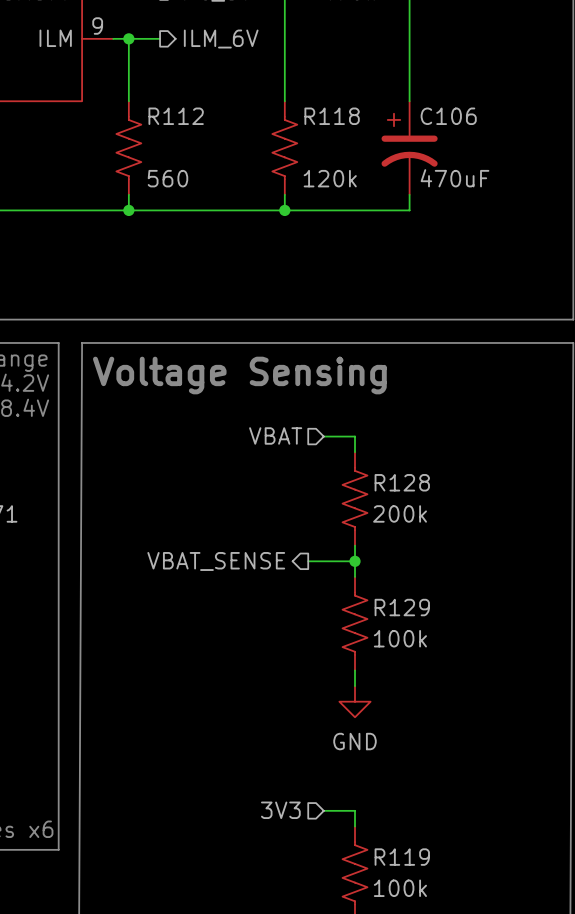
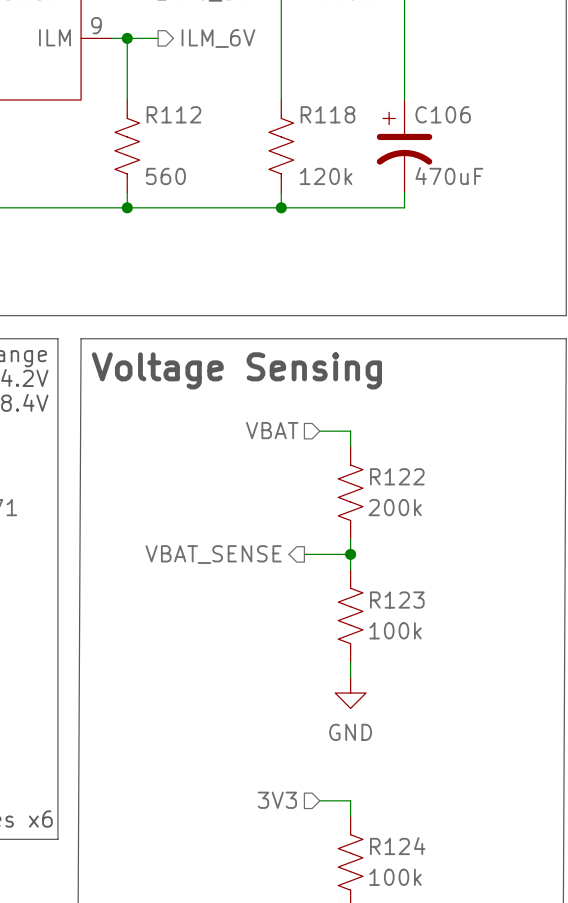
R128 name: R128 (402, 482) -> R122 (397, 476)
R129 name: R129 (402, 607) -> R123 (397, 600)
R119 name: R119 (402, 857) -> R124 (397, 846)

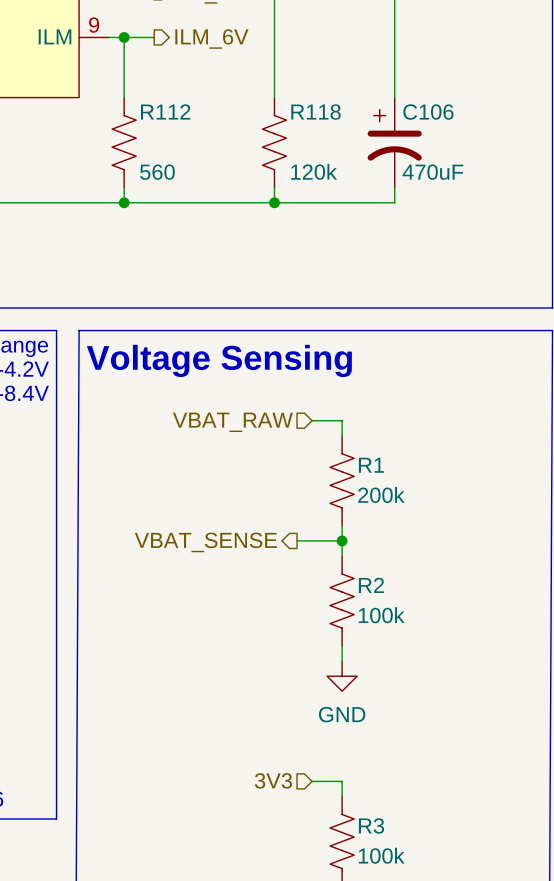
hierarchical label: VBAT (272, 430) -> VBAT_RAW (232, 422)
R122 name: R122 (397, 476) -> R1 (371, 465)
R123 name: R123 (397, 600) -> R2 (371, 585)
R124 name: R124 (397, 846) -> R3 (371, 825)

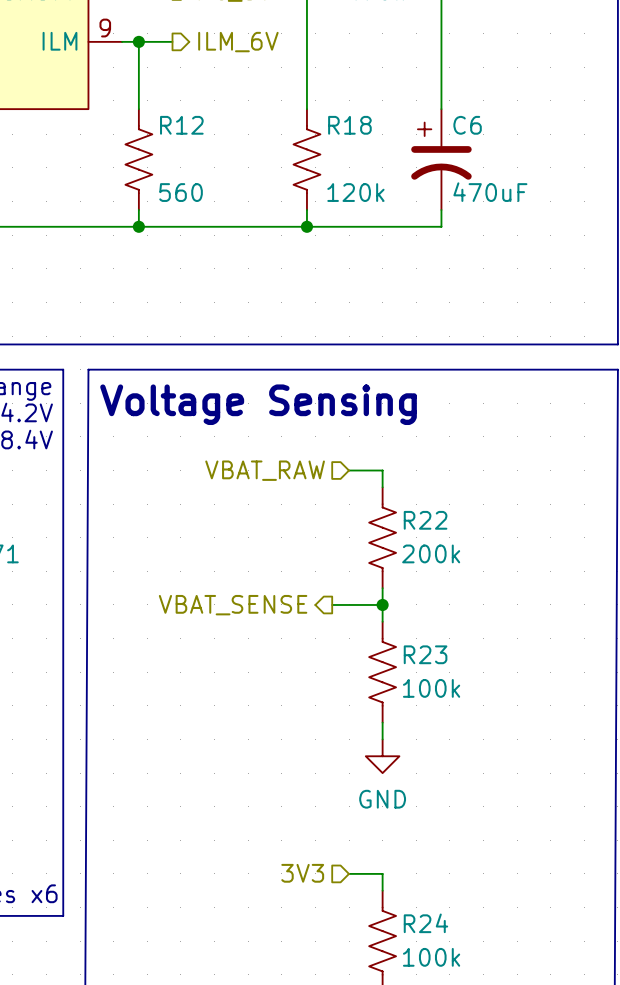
R112 name: R112 (165, 111) -> R12 (181, 125)
R118 name: R118 (316, 112) -> R18 (349, 125)
C106 name: C106 (428, 112) -> C6 (467, 125)
R1 name: R1 (371, 465) -> R22 (425, 520)
R2 name: R2 (371, 585) -> R23 (425, 654)
R3 name: R3 (371, 825) -> R24 (425, 923)

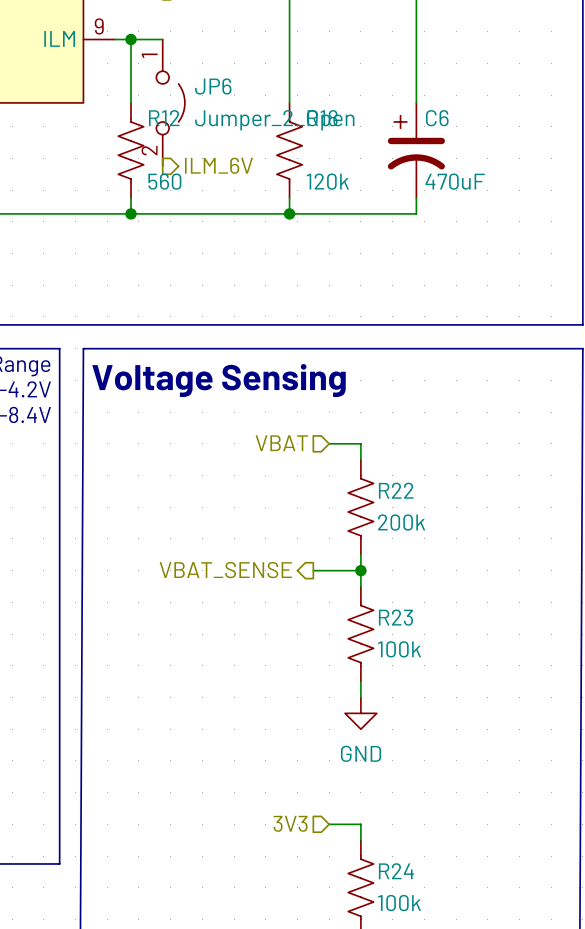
hierarchical label position: ILM_6V (238, 42) -> ILM_6V (218, 165)
JP6: none -> Jumper_2_Open (170, 102)
hierarchical label: VBAT_RAW (265, 470) -> VBAT (281, 443)

